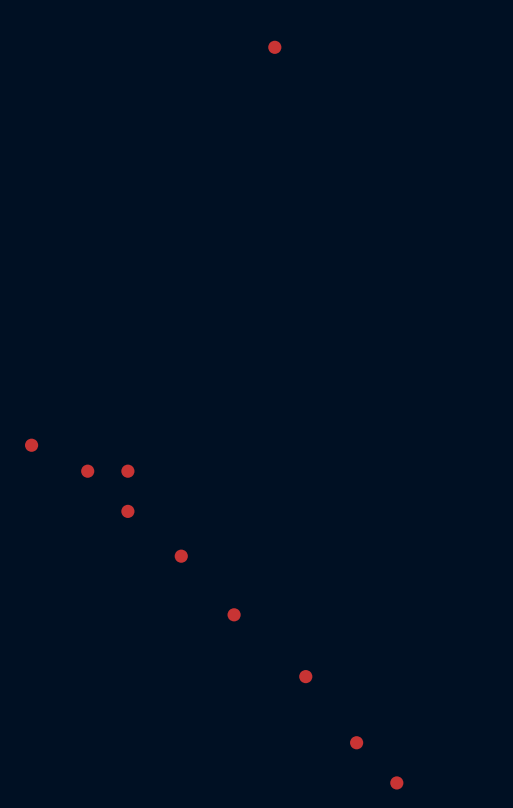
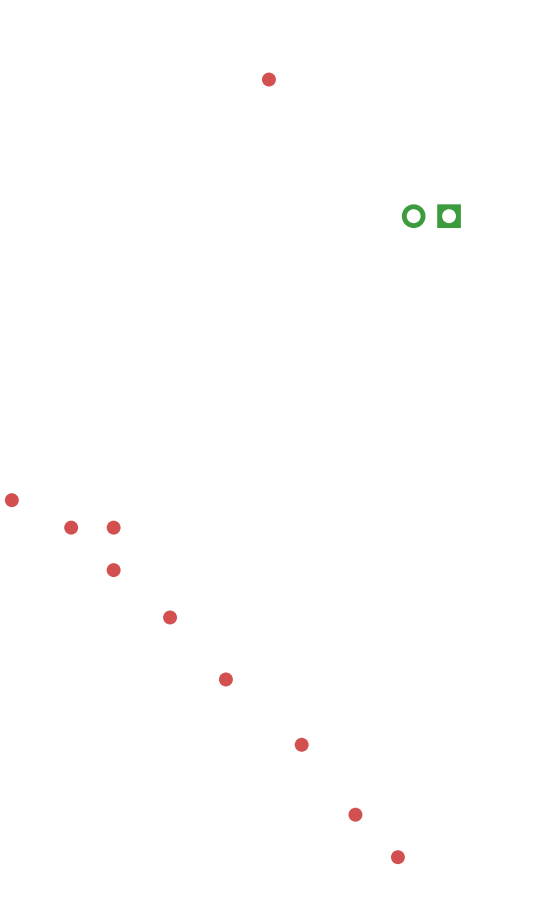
part: none -> (431, 216)

